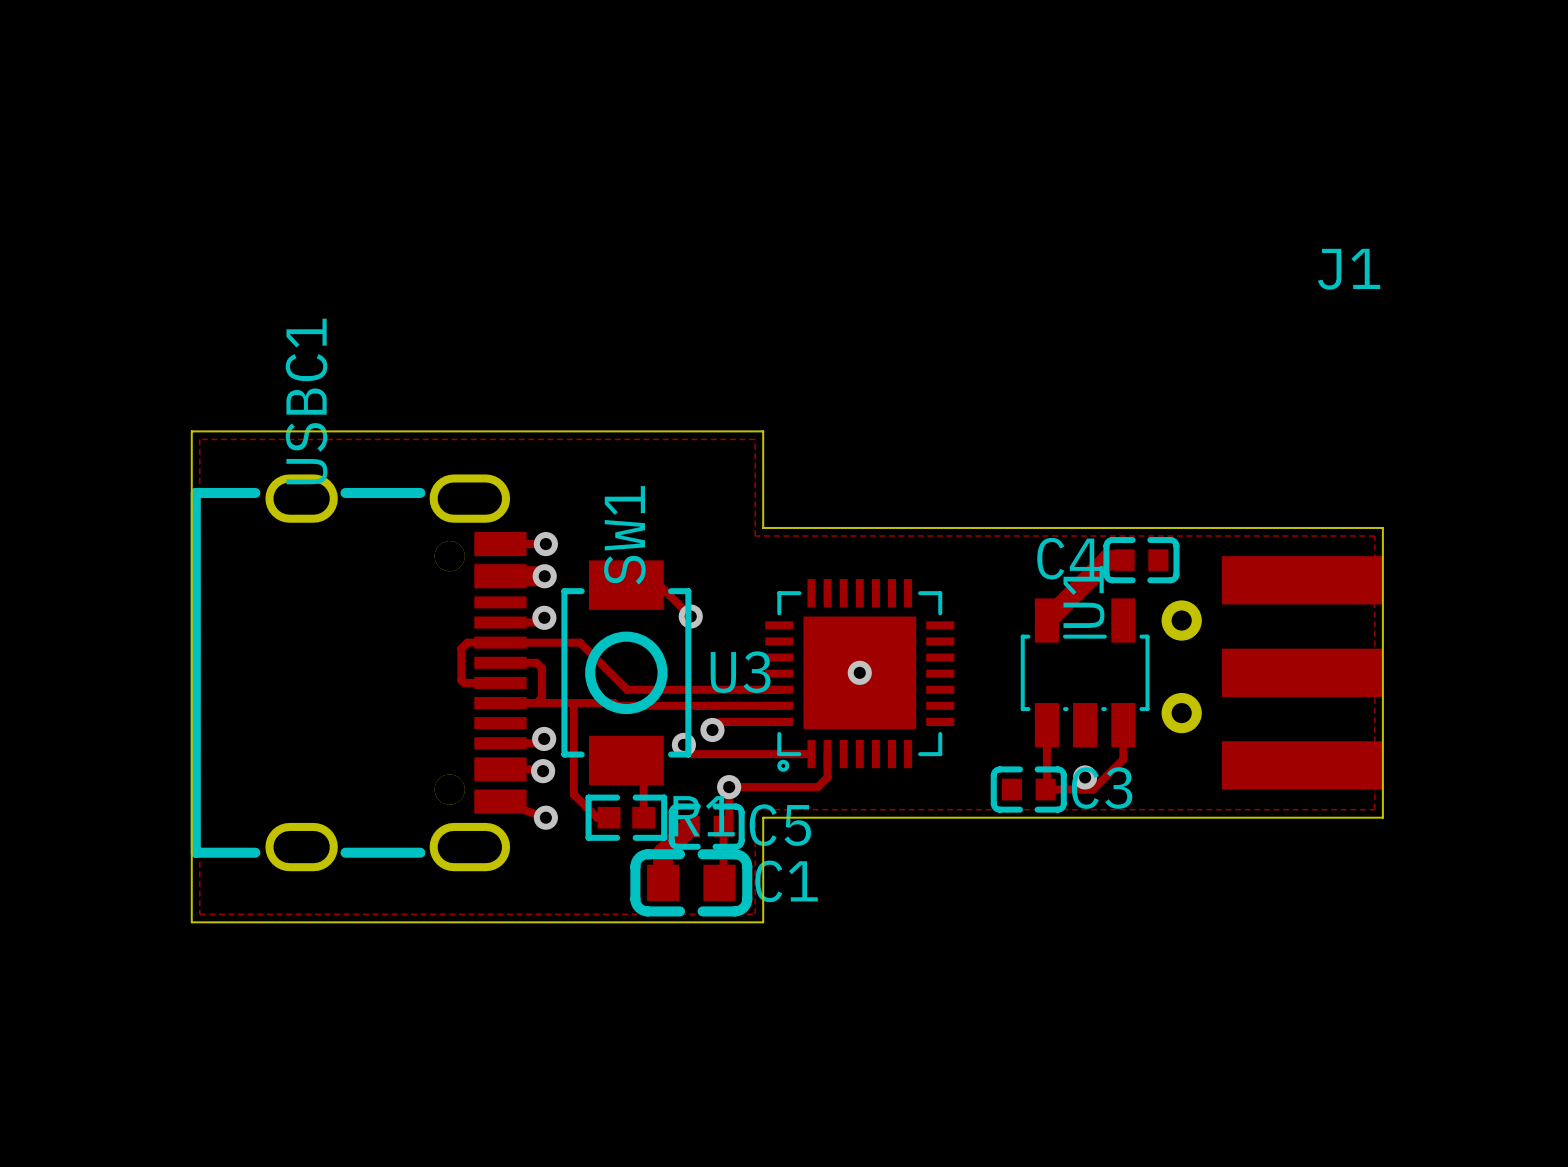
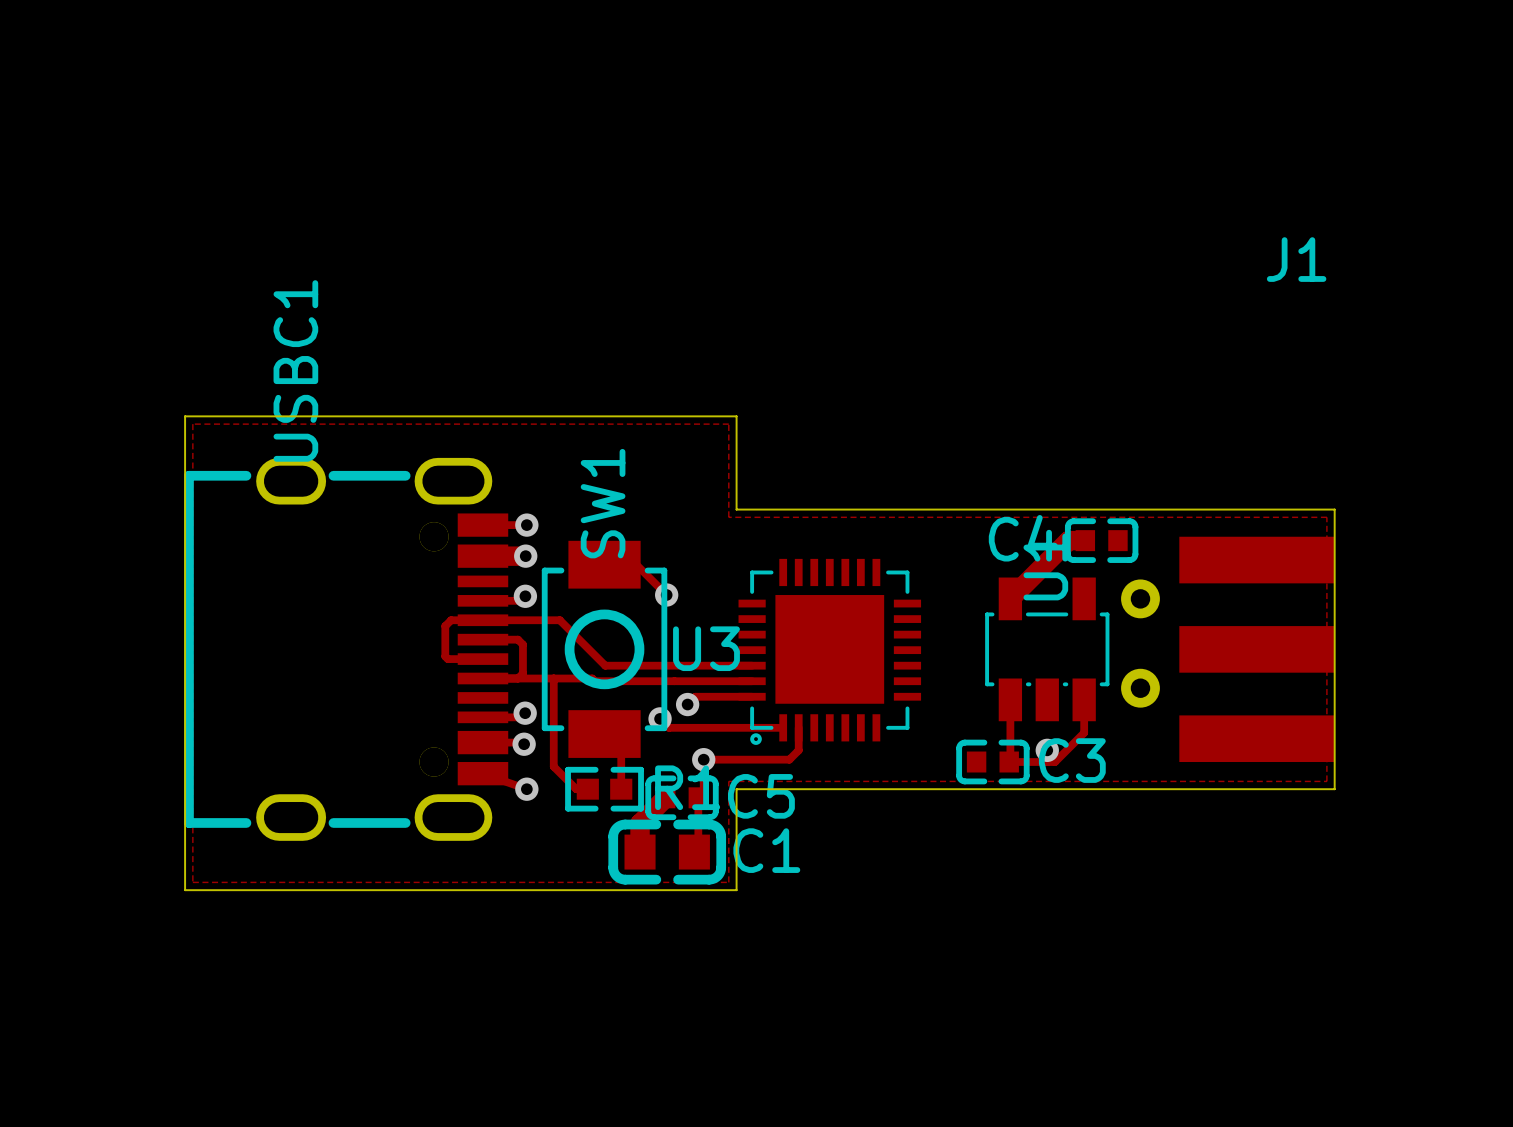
via: (859, 672) -> none

